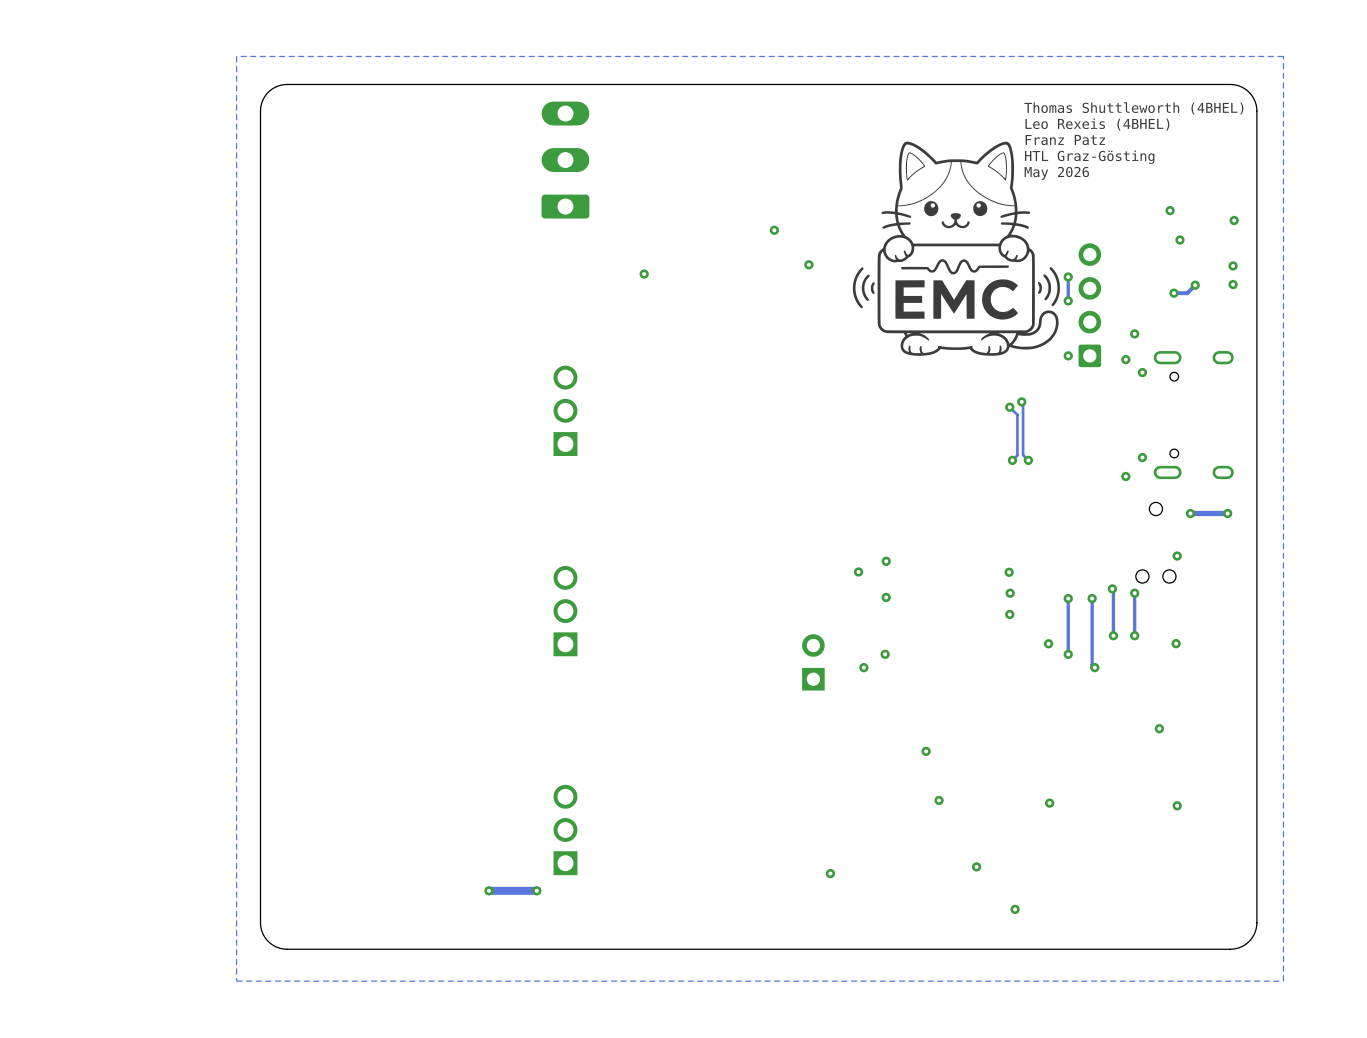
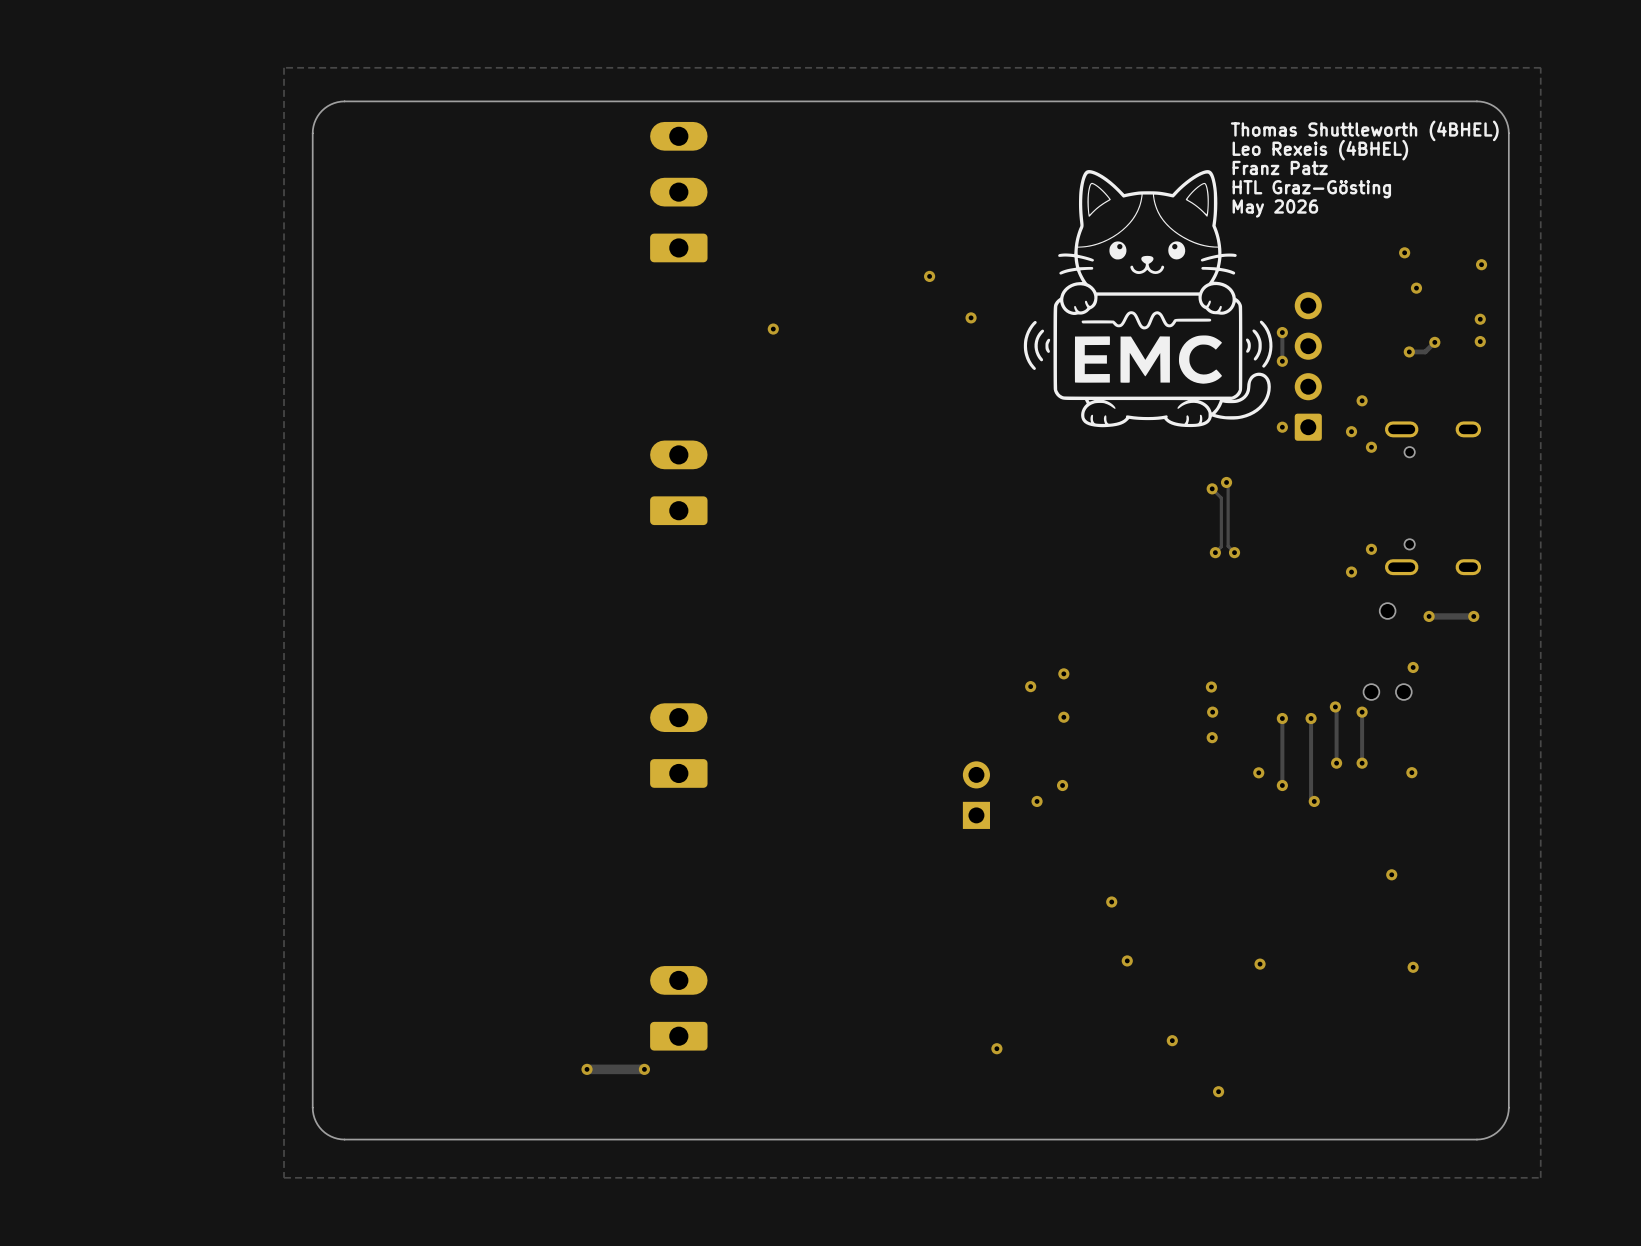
part footprint: [553, 365, 578, 456] -> [650, 440, 708, 526]
part footprint: [553, 565, 578, 657] -> [650, 703, 708, 788]
part footprint: [553, 784, 578, 876] -> [650, 966, 708, 1051]

